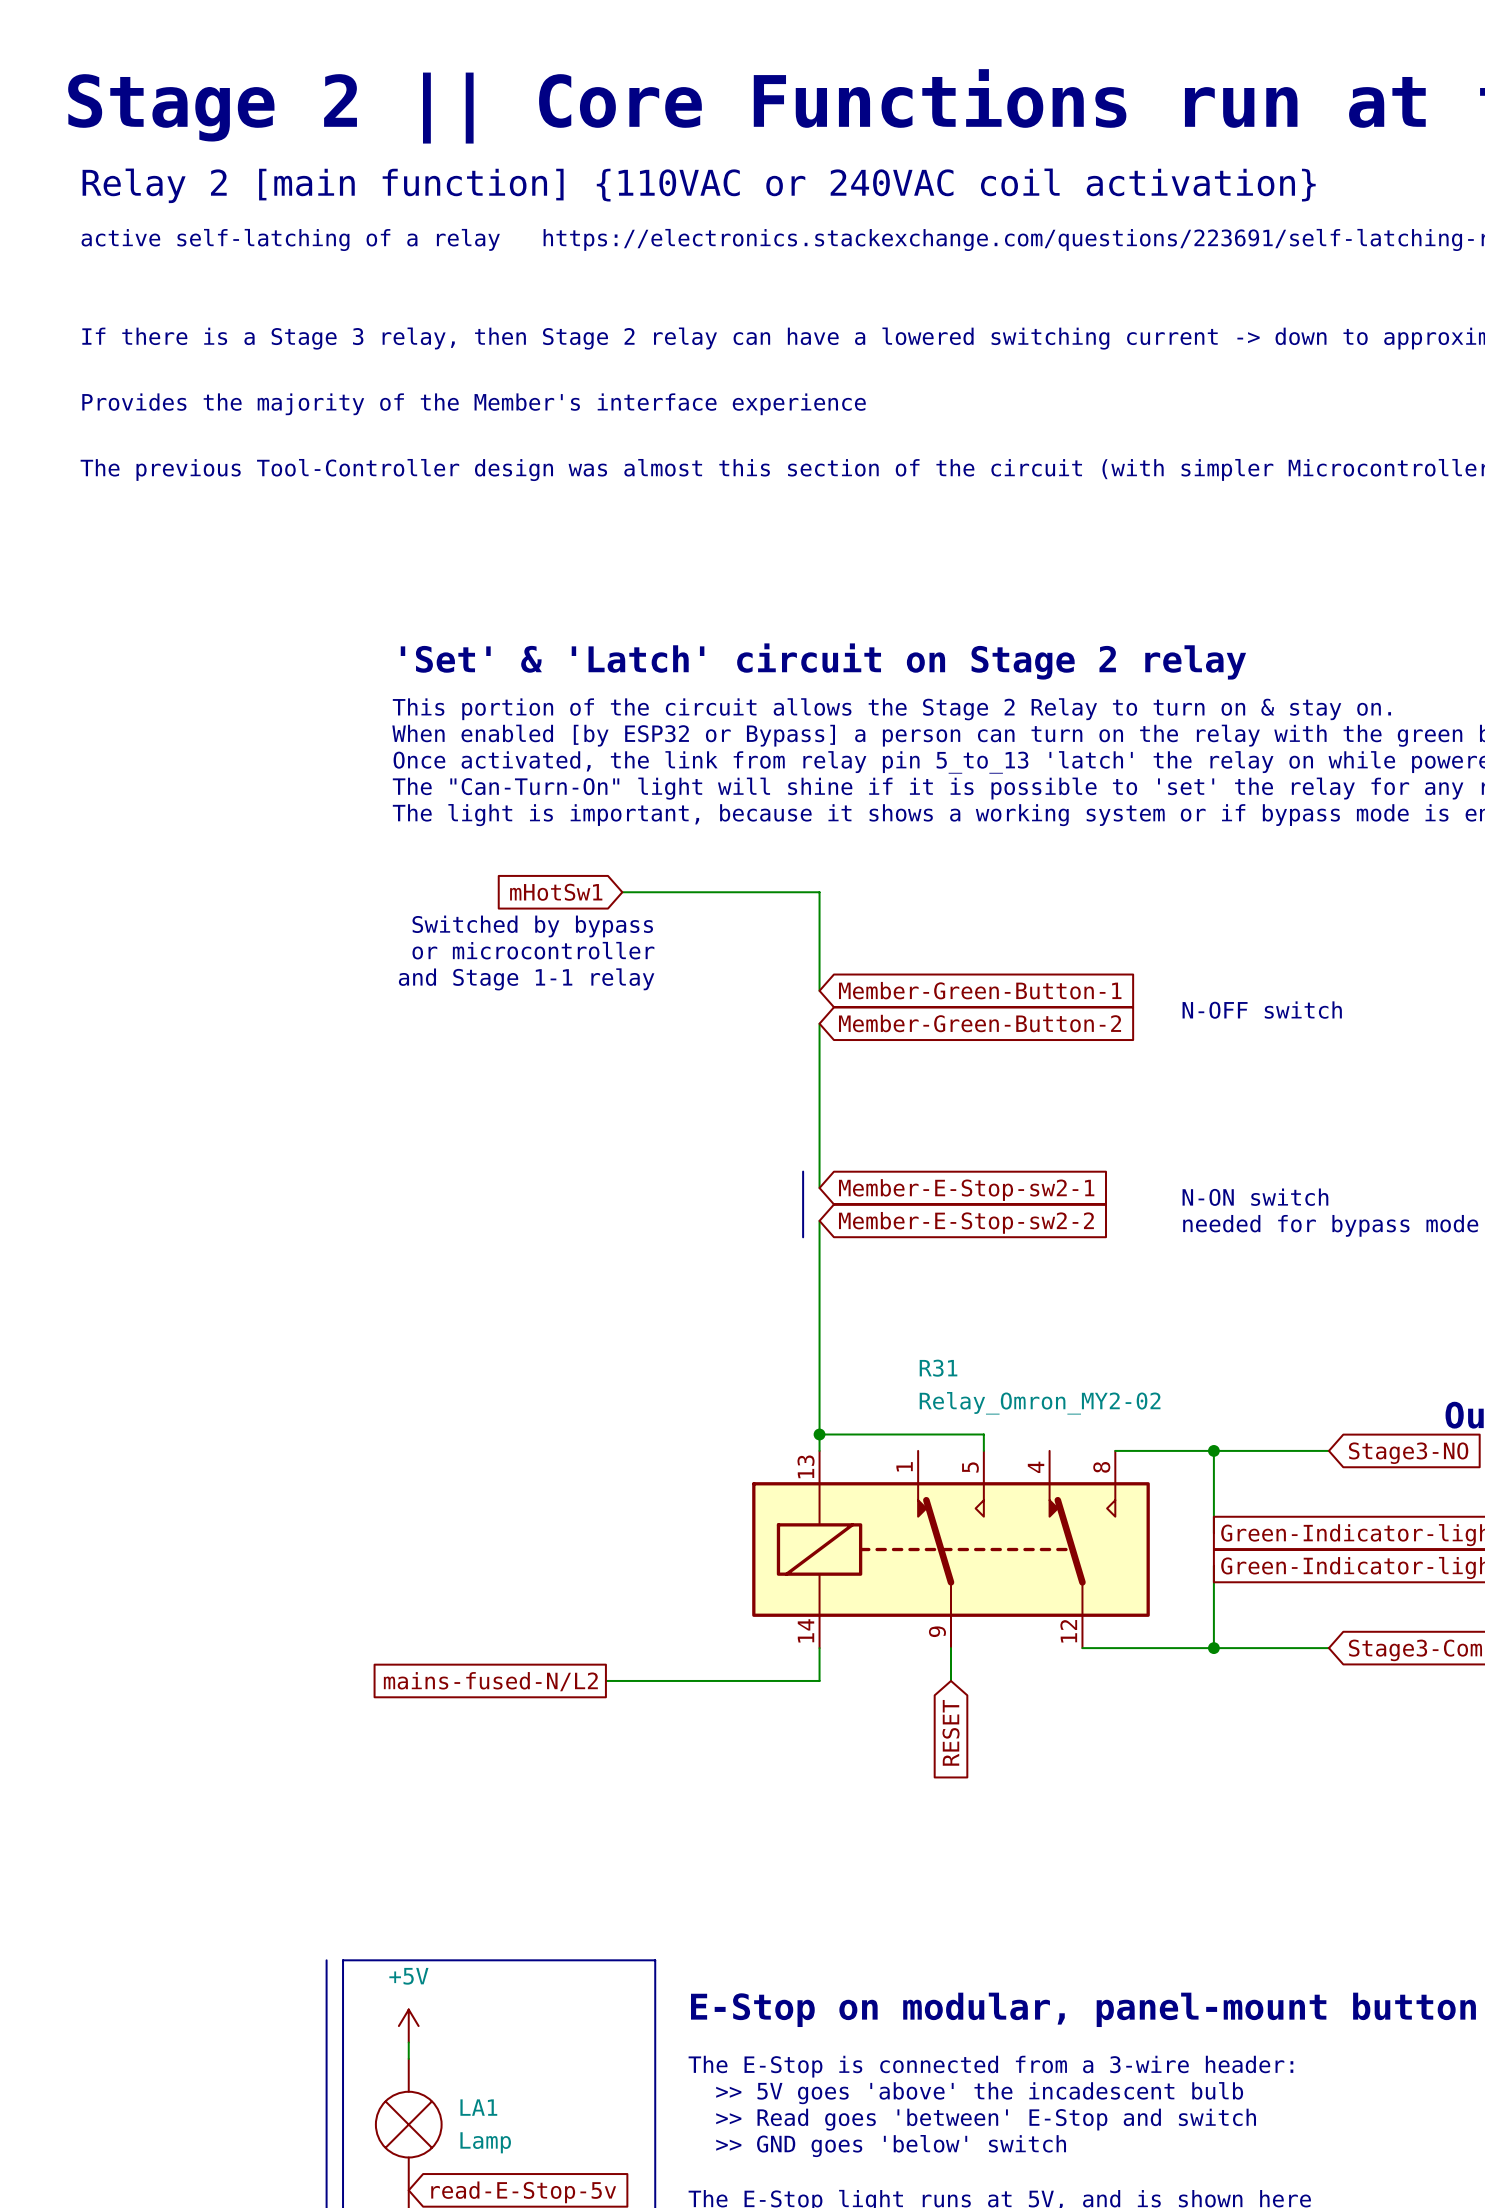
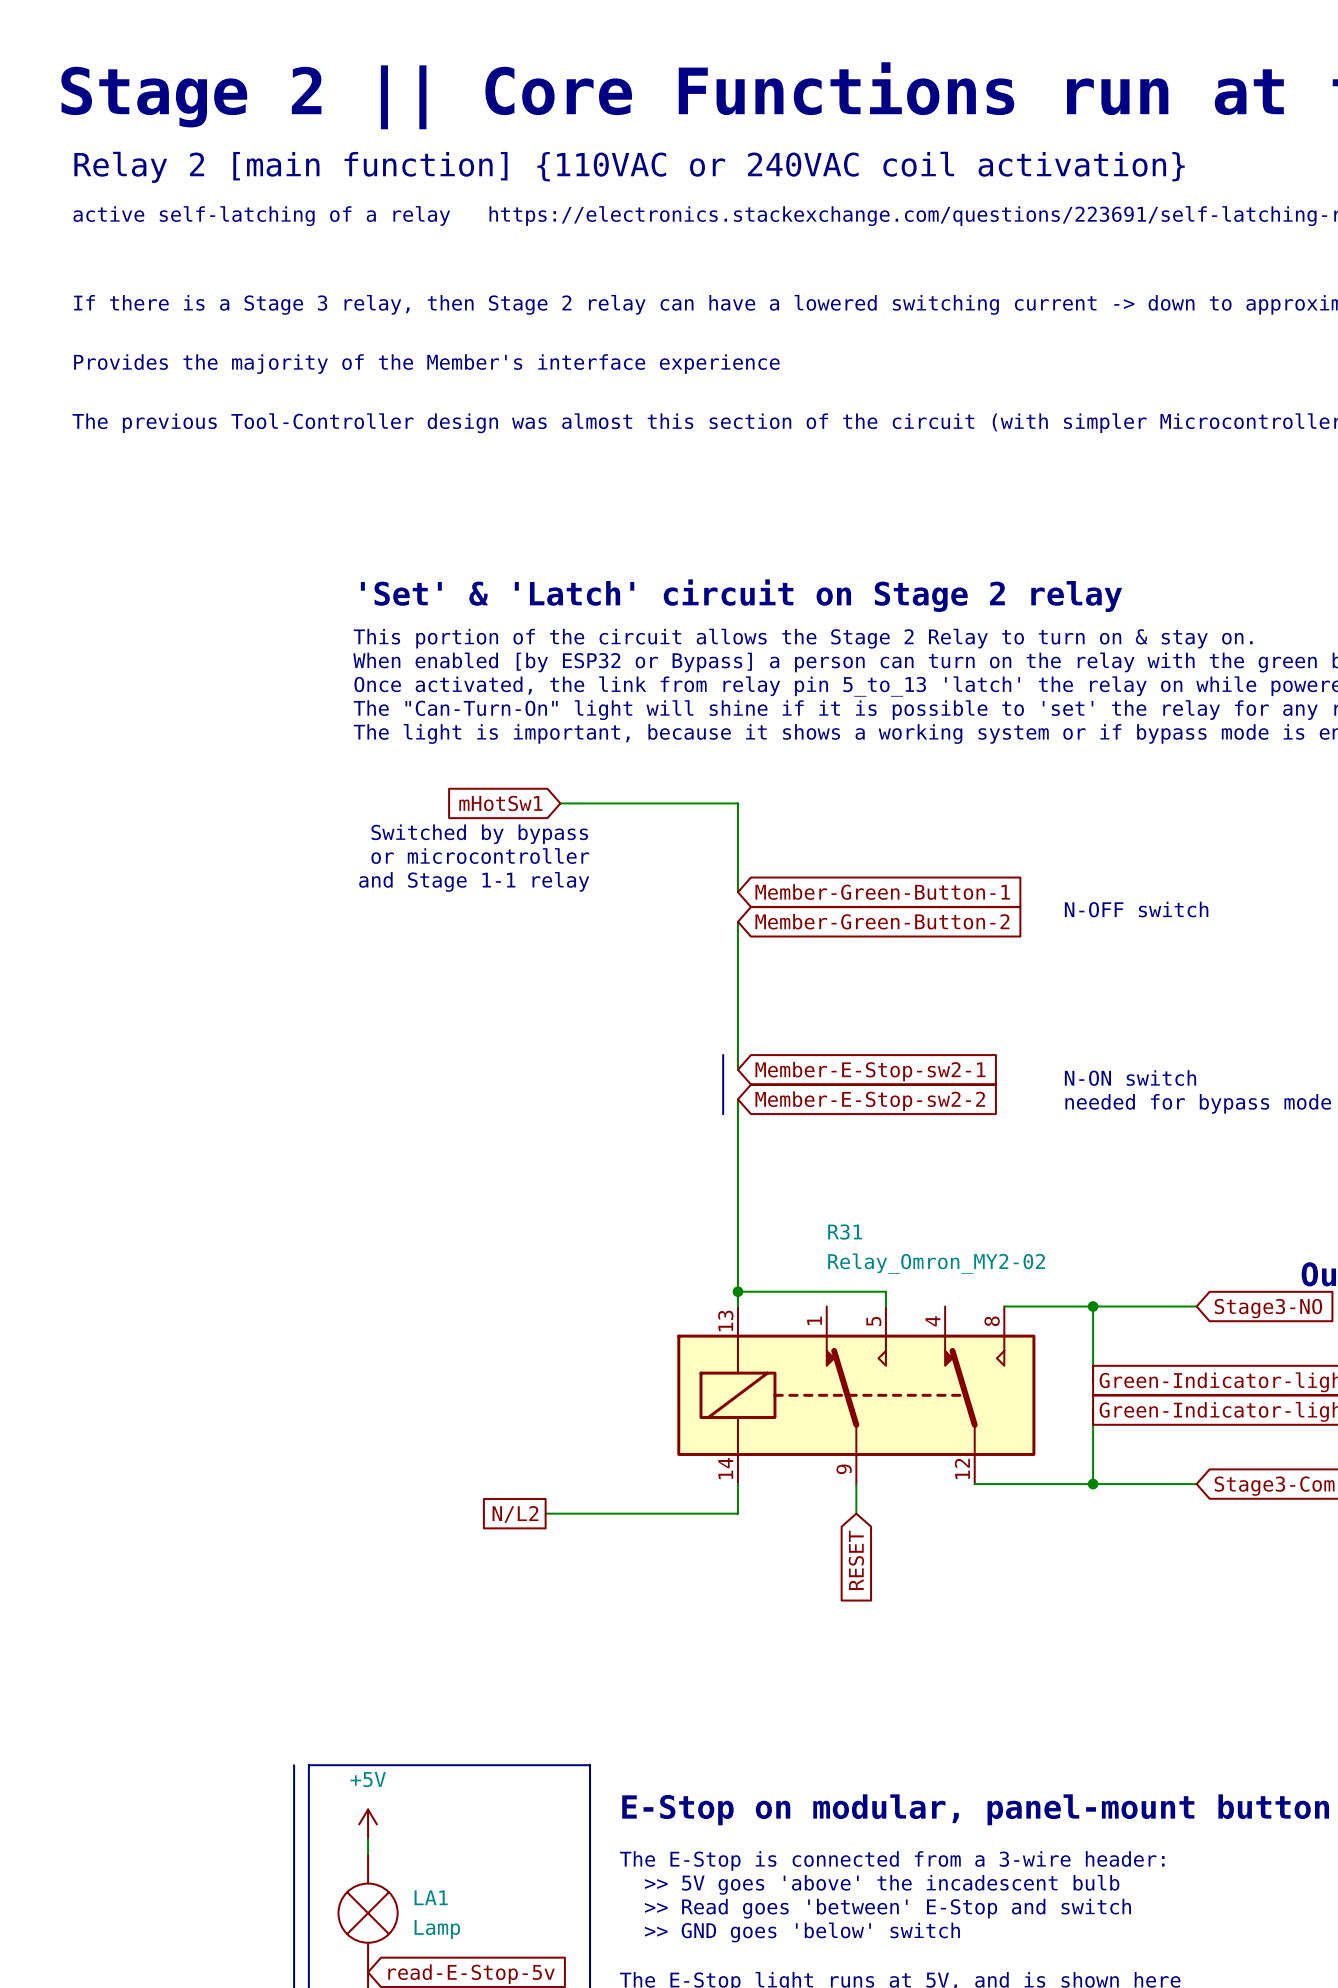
global label: mains-fused-N/L2 (490, 1681) -> N/L2 (515, 1514)

